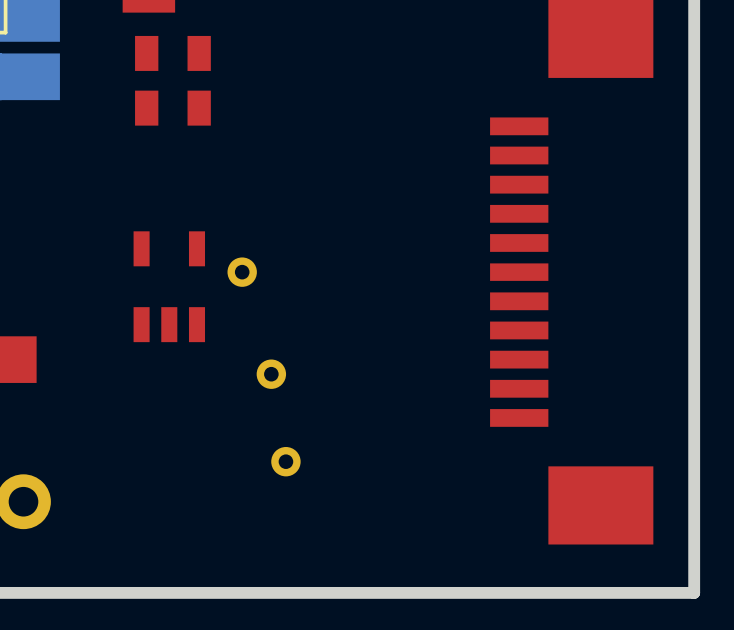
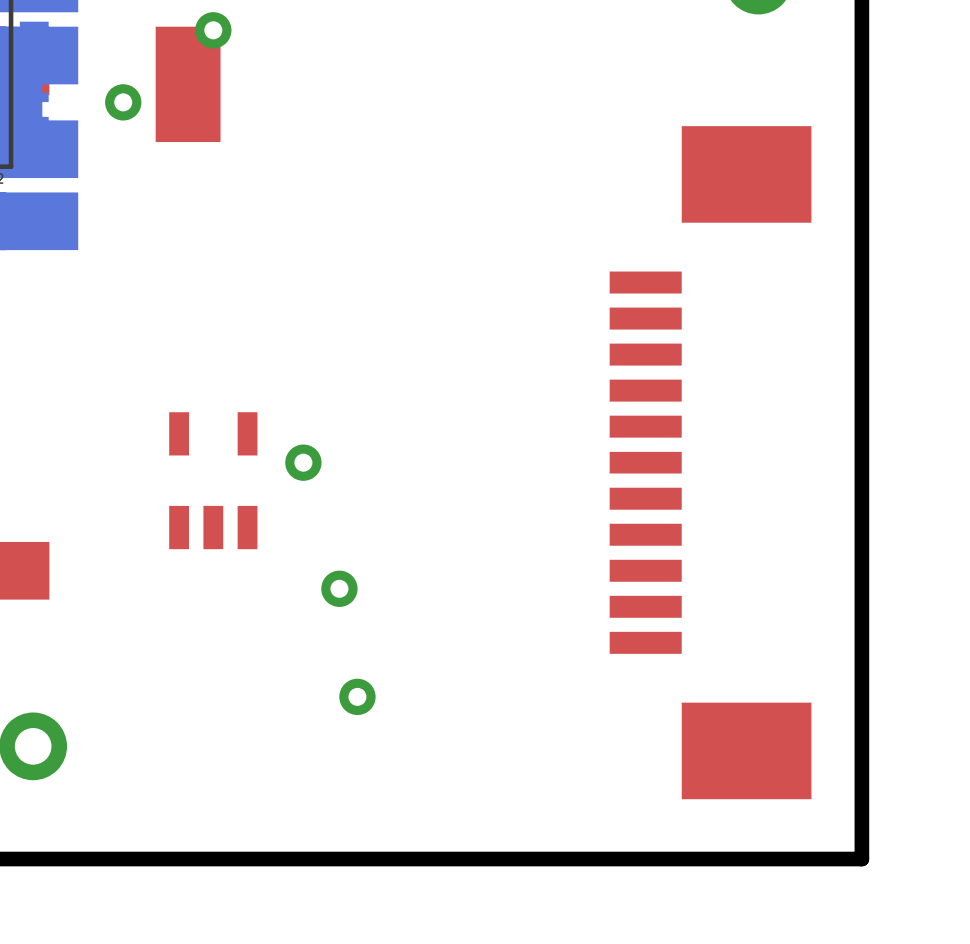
part: (172, 53) -> none
part: (172, 108) -> none

